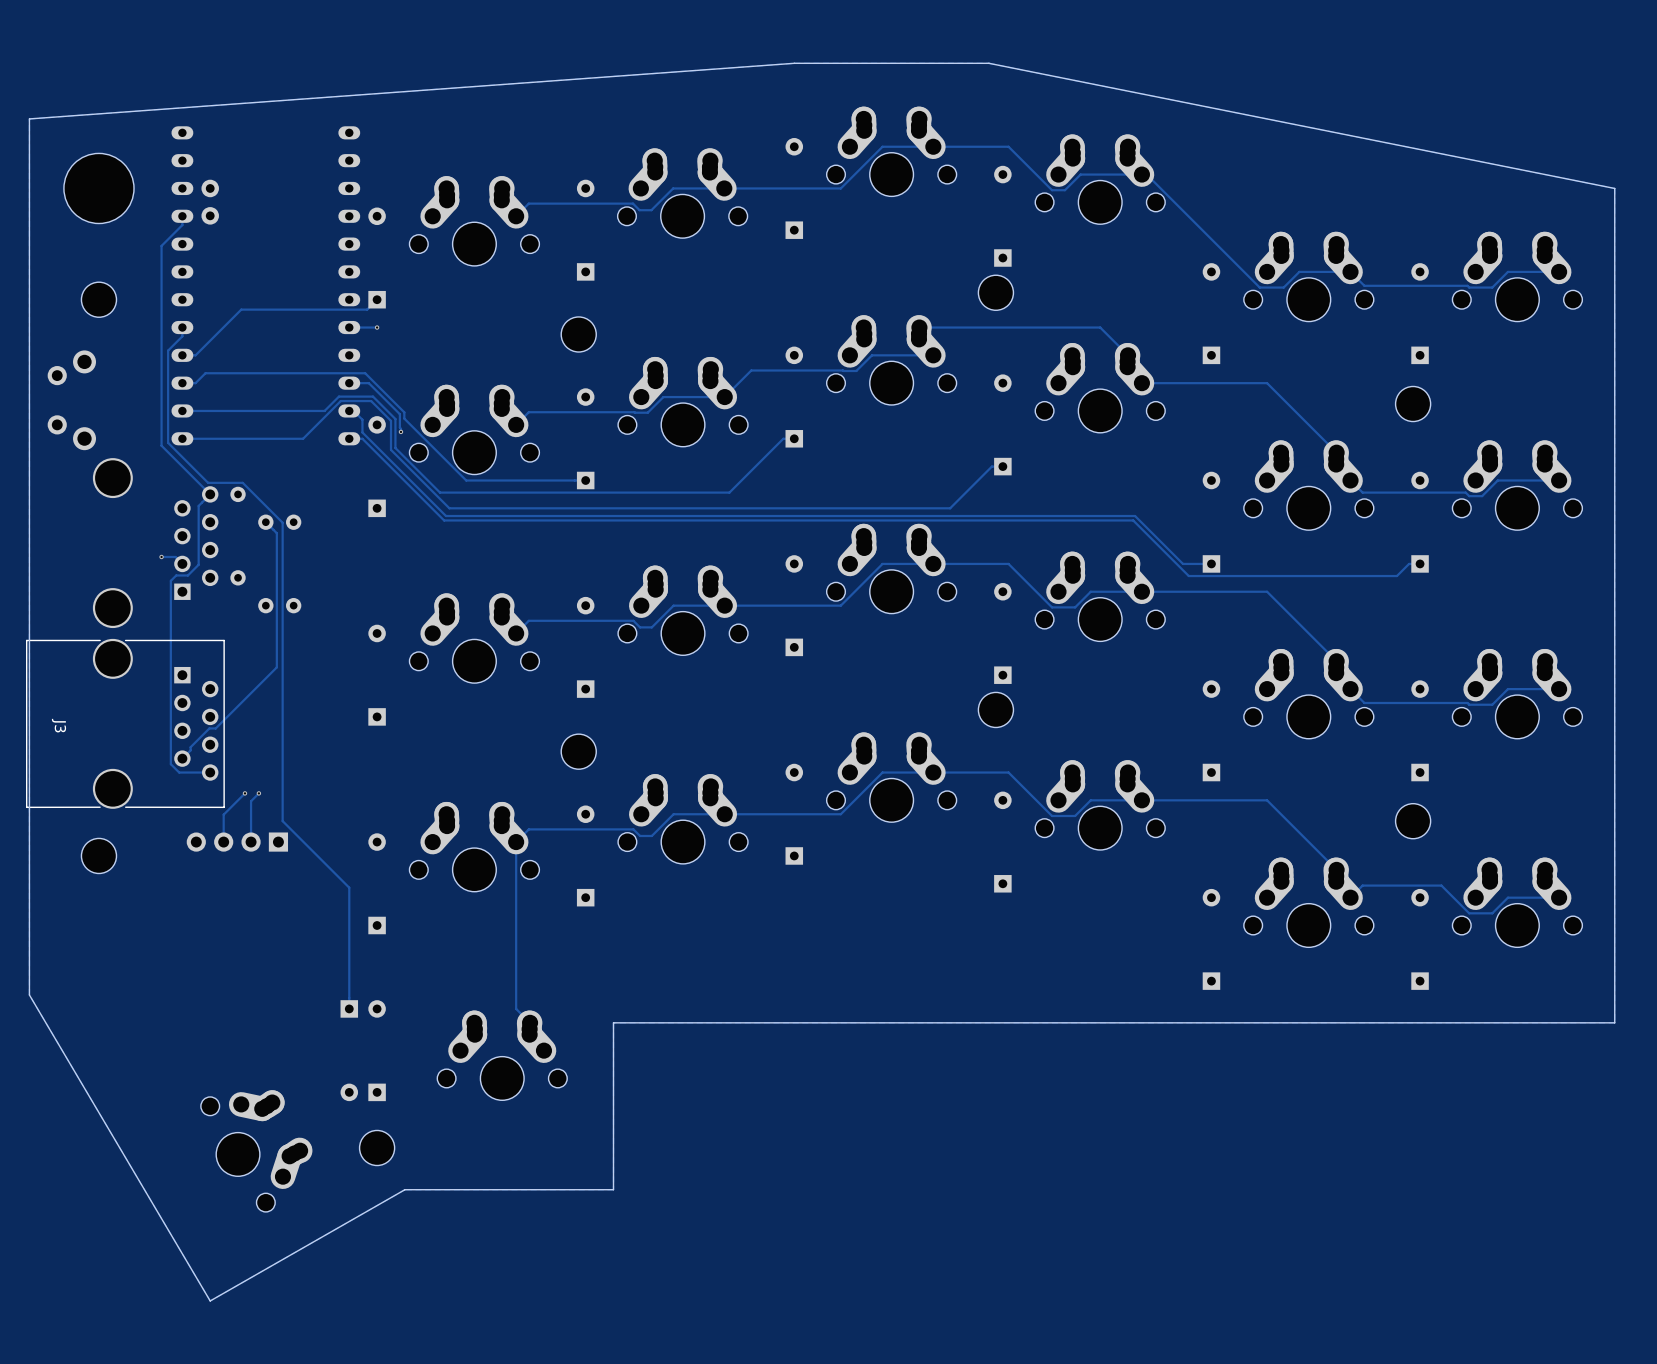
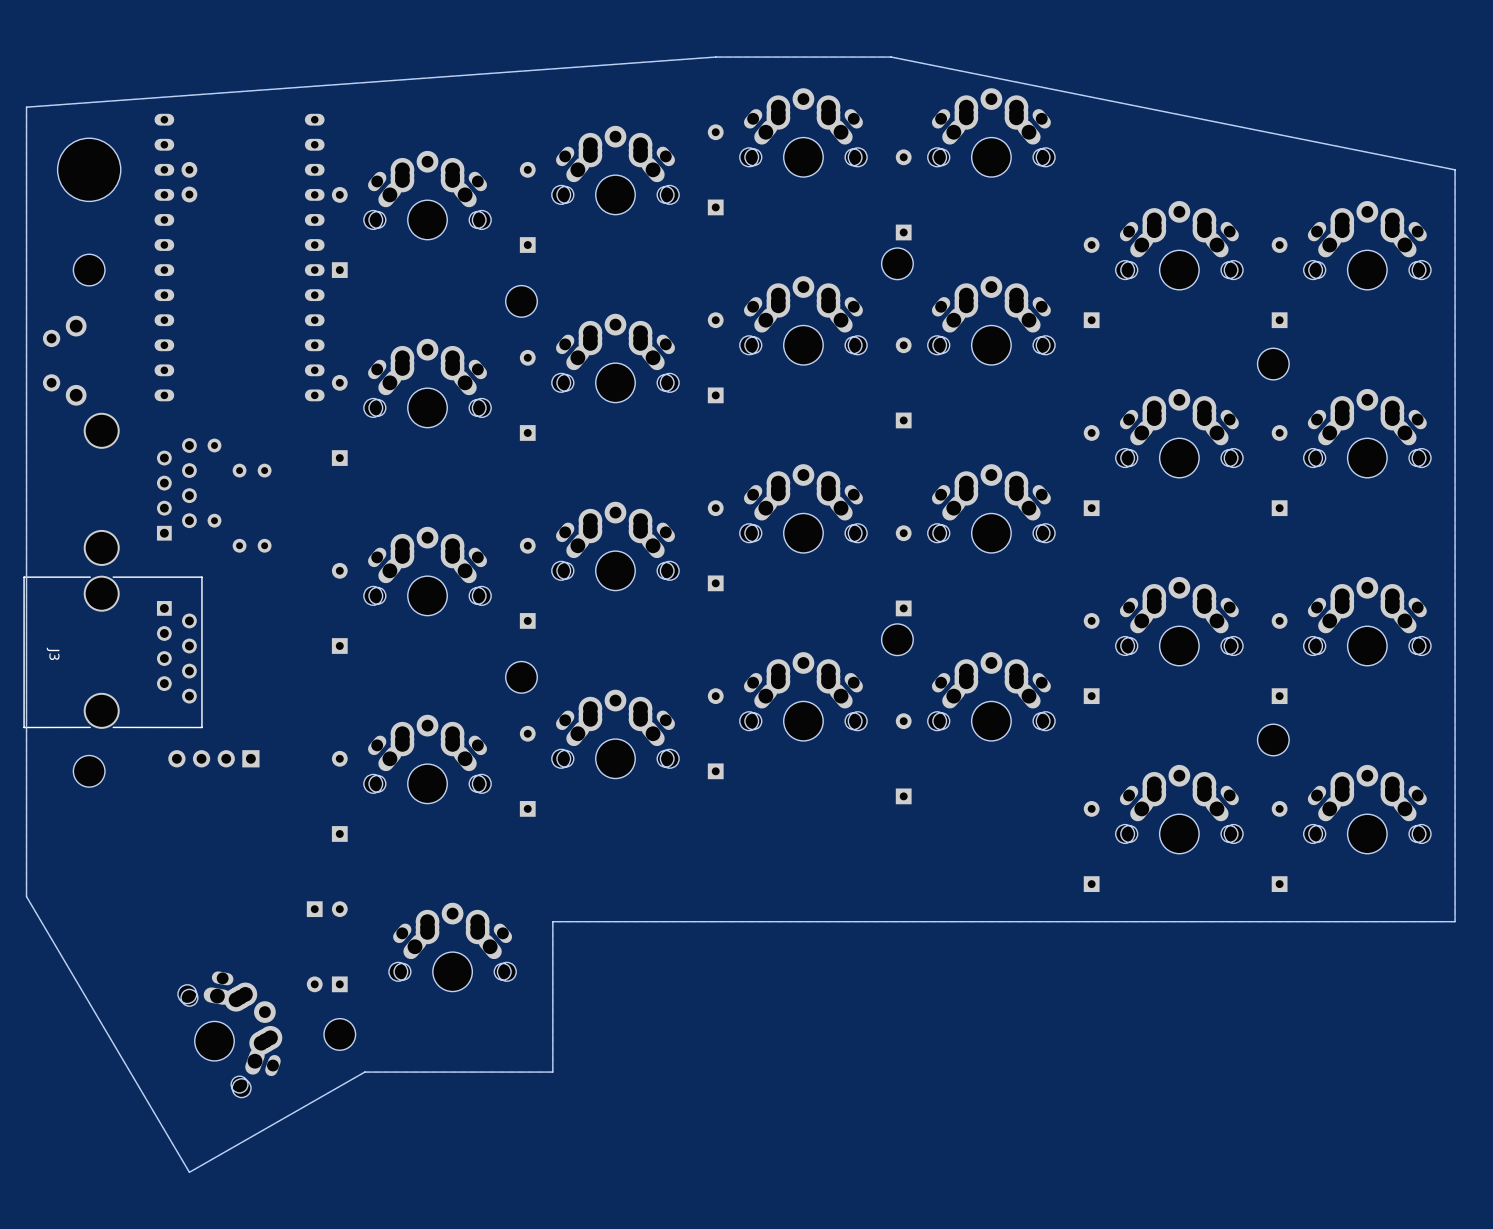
part footprint: [826, 106, 957, 197] -> [739, 88, 868, 178]
part: none -> (991, 132)
part footprint: [617, 148, 748, 239] -> [551, 125, 680, 215]
part footprint: [409, 176, 540, 266] -> [363, 150, 492, 240]
part: (1100, 179) -> none
track: (182, 216) (182, 225) (161, 245) (161, 445) (210, 494) (198, 505) (198, 564) (187, 575) (176, 575) (170, 580) (170, 764) (179, 772) (210, 772) -> none
track: (516, 216) (528, 203) (633, 203) (639, 210) (651, 210) (673, 188) (840, 188) (882, 146) (1008, 146) (1052, 190) (1064, 190) (1080, 174) (1146, 174) (1259, 287) (1283, 287) (1299, 271) (1350, 271) (1364, 285) (1467, 285) (1469, 287) (1492, 287) (1507, 271) (1559, 271) -> none
part footprint: [1243, 231, 1374, 322] -> [1115, 201, 1244, 290]
part footprint: [1452, 231, 1583, 322] -> [1303, 201, 1431, 290]
track: (377, 299) (367, 309) (241, 309) (195, 355) (182, 355) -> none
part footprint: [826, 315, 957, 405] -> [739, 276, 868, 365]
track: (182, 327) (182, 336) (168, 350) (168, 442) (208, 482) (242, 482) (282, 522) (282, 821) (349, 887) (349, 1008) -> none
track: (377, 327) (349, 327) -> none
via: (377, 327) -> none
track: (919, 327) (1100, 327) (1128, 355) -> none
track: (933, 355) (872, 355) (856, 370) (751, 370) (724, 397) (663, 397) (647, 412) (528, 412) (516, 424) -> none
part: none -> (991, 320)
part footprint: [618, 356, 748, 447] -> [551, 313, 680, 403]
track: (182, 383) (195, 383) (205, 373) (365, 373) (404, 412) (404, 418) (466, 480) (585, 480) -> none
track: (349, 383) (368, 383) (399, 414) (400, 431) -> none
track: (1141, 383) (1267, 383) (1336, 452) -> none
part footprint: [409, 384, 540, 475] -> [363, 338, 492, 428]
part: (1100, 387) -> none
track: (182, 410) (324, 410) (338, 396) (373, 396) (395, 419) (395, 448) (439, 492) (729, 492) (783, 438) (794, 438) -> none
track: (349, 410) (353, 410) (362, 419) (362, 432) (445, 516) (1135, 516) (1182, 563) (1211, 563) -> none
via: (400, 431) -> none
track: (182, 438) (303, 438) (340, 401) (371, 401) (391, 420) (391, 449) (449, 508) (950, 508) (991, 466) (1002, 466) -> none
track: (349, 438) (362, 438) (444, 520) (1133, 520) (1188, 576) (1396, 576) (1409, 563) (1420, 563) -> none
part footprint: [1243, 440, 1374, 531] -> [1115, 388, 1244, 478]
part footprint: [1452, 440, 1583, 531] -> [1303, 388, 1431, 478]
track: (1559, 480) (1497, 480) (1482, 496) (1469, 496) (1465, 492) (1362, 492) (1350, 480) -> none
track: (265, 522) (276, 533) (276, 667) (215, 728) (209, 728) (182, 758) -> none
part footprint: [826, 523, 957, 614] -> [739, 464, 868, 553]
track: (161, 556) (175, 556) (182, 563) -> none
via: (161, 556) -> none
part: none -> (991, 508)
part footprint: [618, 565, 748, 656] -> [551, 501, 680, 591]
part footprint: [409, 593, 540, 684] -> [363, 526, 492, 616]
part: (1100, 596) -> none
track: (516, 633) (528, 620) (633, 620) (640, 627) (651, 627) (673, 605) (840, 605) (882, 563) (1008, 563) (1052, 607) (1075, 607) (1090, 591) (1267, 591) (1336, 661) -> none
part footprint: [1243, 648, 1374, 739] -> [1115, 576, 1244, 666]
part footprint: [1452, 648, 1583, 739] -> [1303, 576, 1431, 666]
track: (1559, 689) (1507, 689) (1492, 704) (1364, 703) (1350, 689) -> none
part footprint: [826, 732, 957, 823] -> [739, 652, 868, 741]
part: none -> (991, 696)
part footprint: [618, 774, 748, 864] -> [551, 689, 680, 779]
track: (244, 793) (223, 814) (223, 842) -> none
via: (244, 793) -> none
track: (258, 793) (251, 801) (251, 842) -> none
via: (258, 793) -> none
part footprint: [409, 801, 540, 892] -> [363, 714, 492, 804]
part: (1100, 805) -> none
part footprint: [1243, 857, 1374, 948] -> [1115, 764, 1244, 854]
part footprint: [1452, 857, 1583, 948] -> [1303, 764, 1431, 854]
track: (1336, 869) (1267, 800) (1090, 800) (1075, 815) (1052, 815) (1008, 772) (882, 772) (840, 814) (673, 814) (651, 835) (640, 835) (633, 829) (528, 829) (516, 842) (516, 1008) (530, 1022) -> none
track: (1559, 897) (1507, 897) (1492, 913) (1469, 913) (1441, 885) (1362, 885) (1350, 897) -> none
part footprint: [437, 1010, 568, 1101] -> [388, 902, 517, 992]
part footprint: [200, 1090, 313, 1212] -> [177, 971, 283, 1098]

